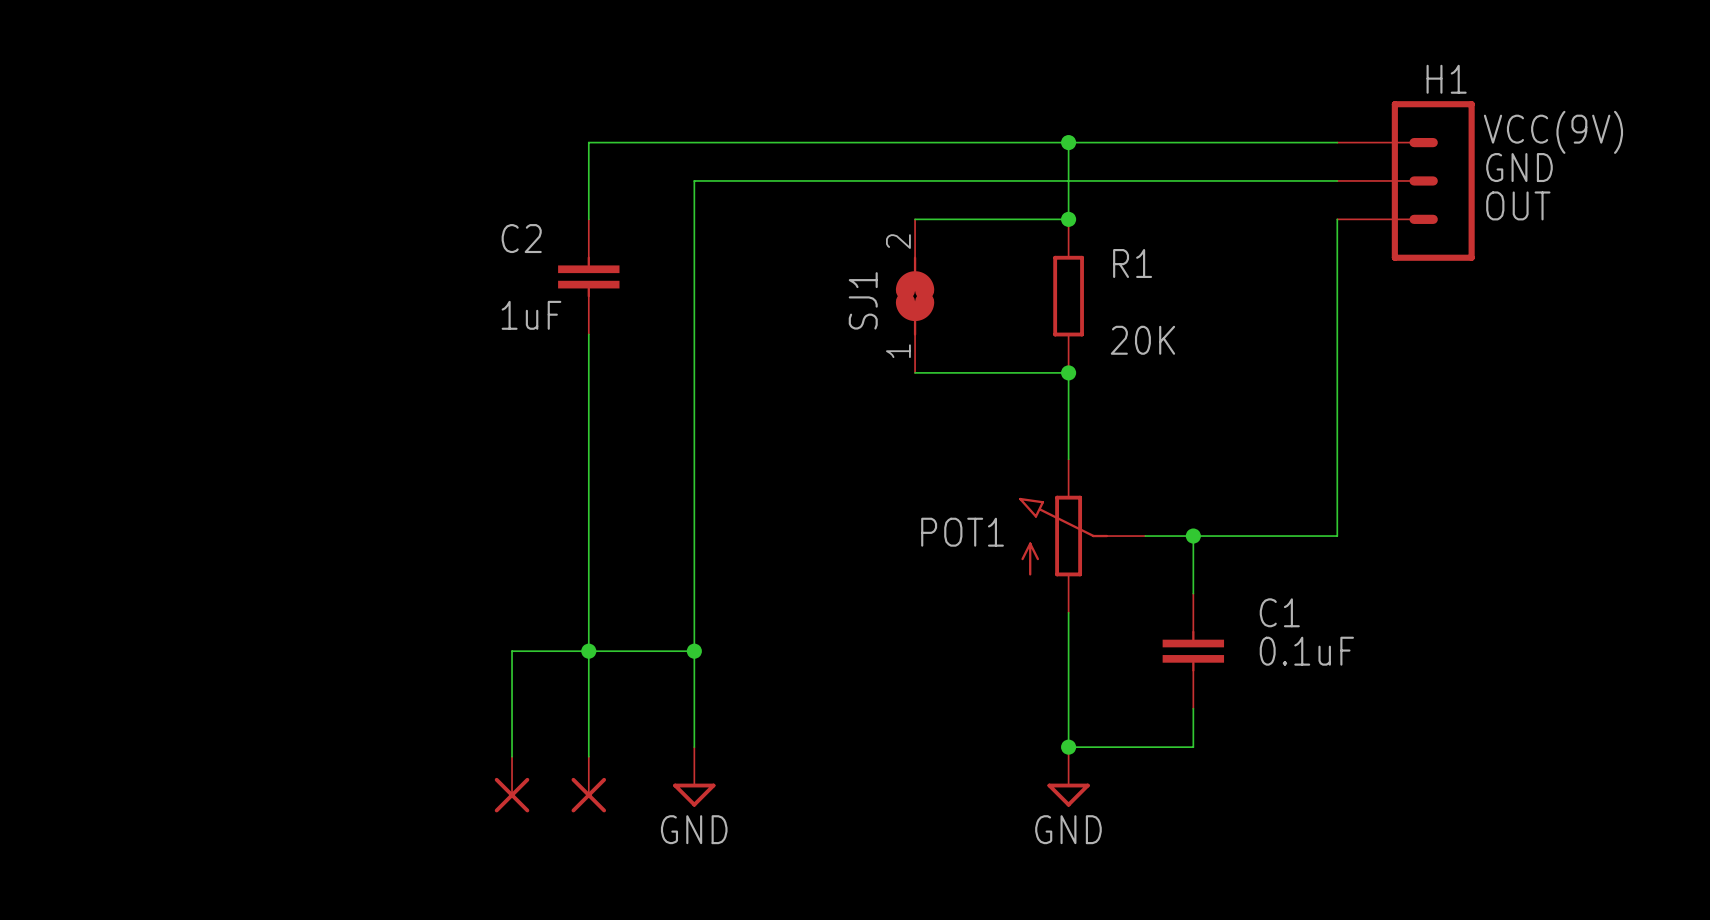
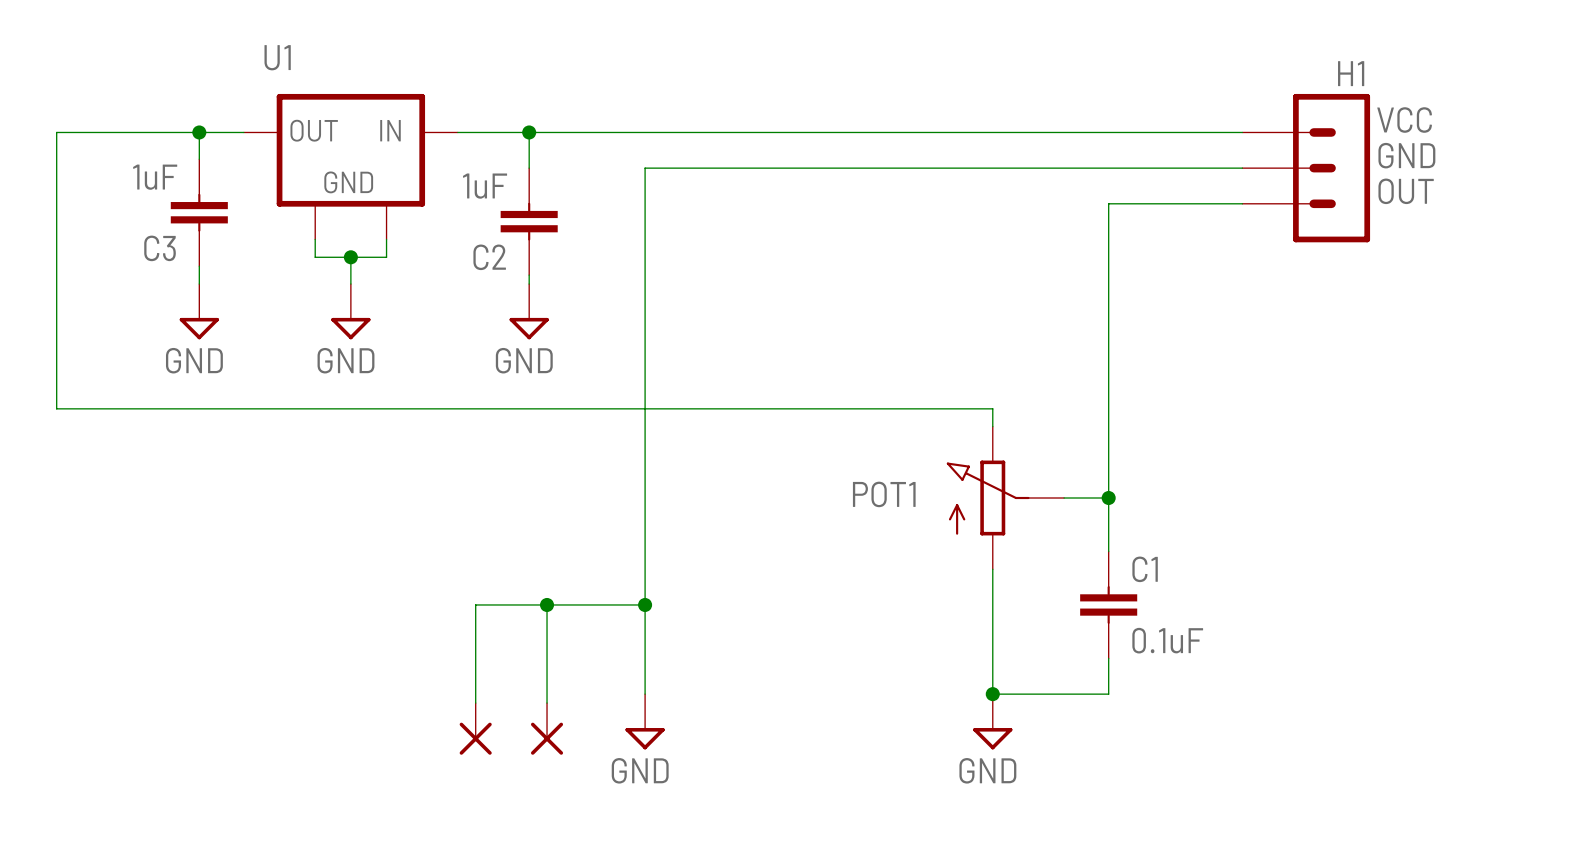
text: VCC(9V) (1553, 132) -> VCC (1404, 120)
wire: none -> (199, 132) (199, 159)
junction: none -> (199, 132)
wire: none -> (529, 132) (529, 168)
junction: none -> (529, 132)
wire: (588, 142) (588, 219) -> (547, 132) (457, 132)
wire: (1068, 142) (1068, 219) (915, 219) -> none
junction: (1068, 142) -> none
U1: none -> (350, 166)
junction: (1068, 219) -> none
wire: (1337, 219) (1337, 536) (1193, 536) -> (1242, 203) (1108, 203) (1108, 498)
C3: none -> 1uF (199, 212)
C2 name position: C2 (521, 238) -> C2 (489, 257)
wire: none -> (315, 239) (315, 257) (386, 257) (386, 239)
wire: none -> (350, 257) (350, 284)
junction: none -> (350, 257)
C2 position: (588, 276) -> (529, 221)
wire: none -> (199, 266) (199, 284)
wire: none -> (529, 275) (529, 284)
SJ1: (915, 296) -> none
R1: 20K (1068, 296) -> none
C2 value position: 1uF (531, 315) -> 1uF (485, 186)
wire: (588, 334) (588, 651) -> none
power symbol: none -> GND (199, 311)
power symbol: none -> GND (350, 311)
power symbol: none -> GND (529, 311)
wire: (915, 372) (1068, 372) (1068, 440) -> (243, 132) (56, 132) (56, 408) (992, 408)
junction: (1068, 372) -> none
C1 name position: C1 (1279, 612) -> C1 (1145, 569)
C1 value position: 0.1uF (1306, 651) -> 0.1uF (1167, 640)

